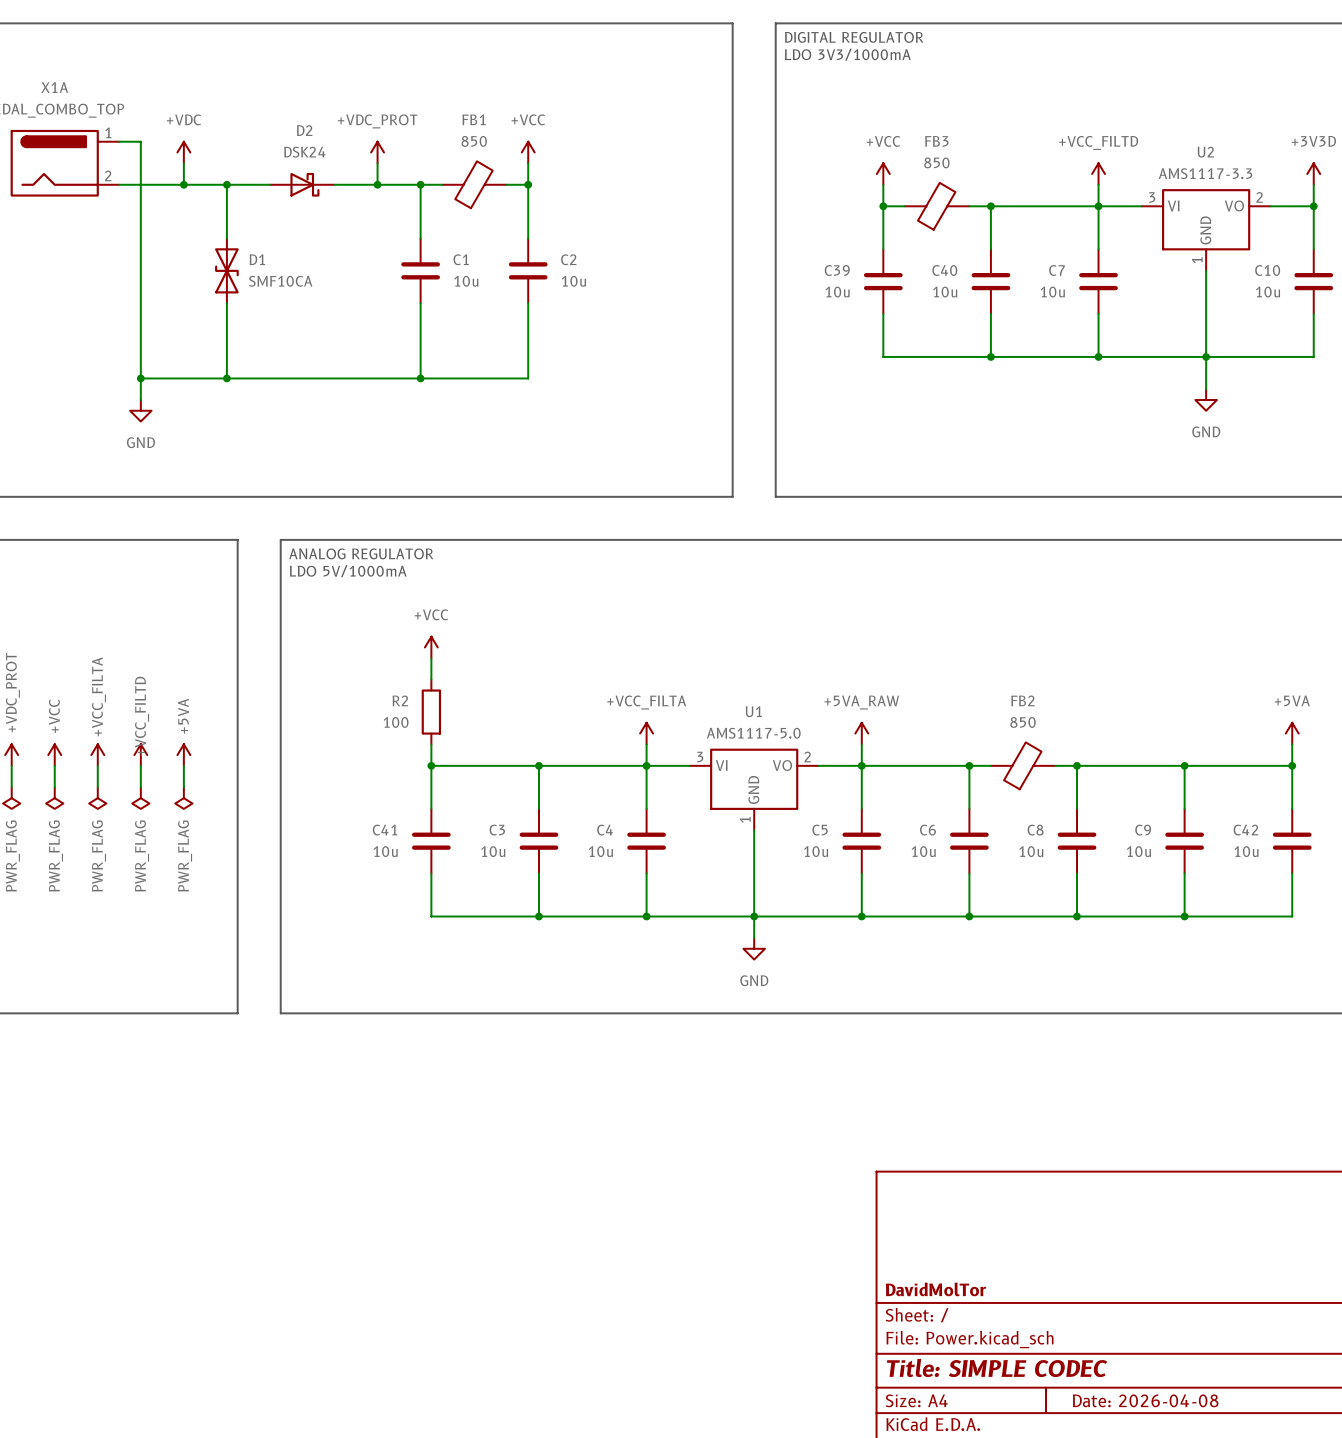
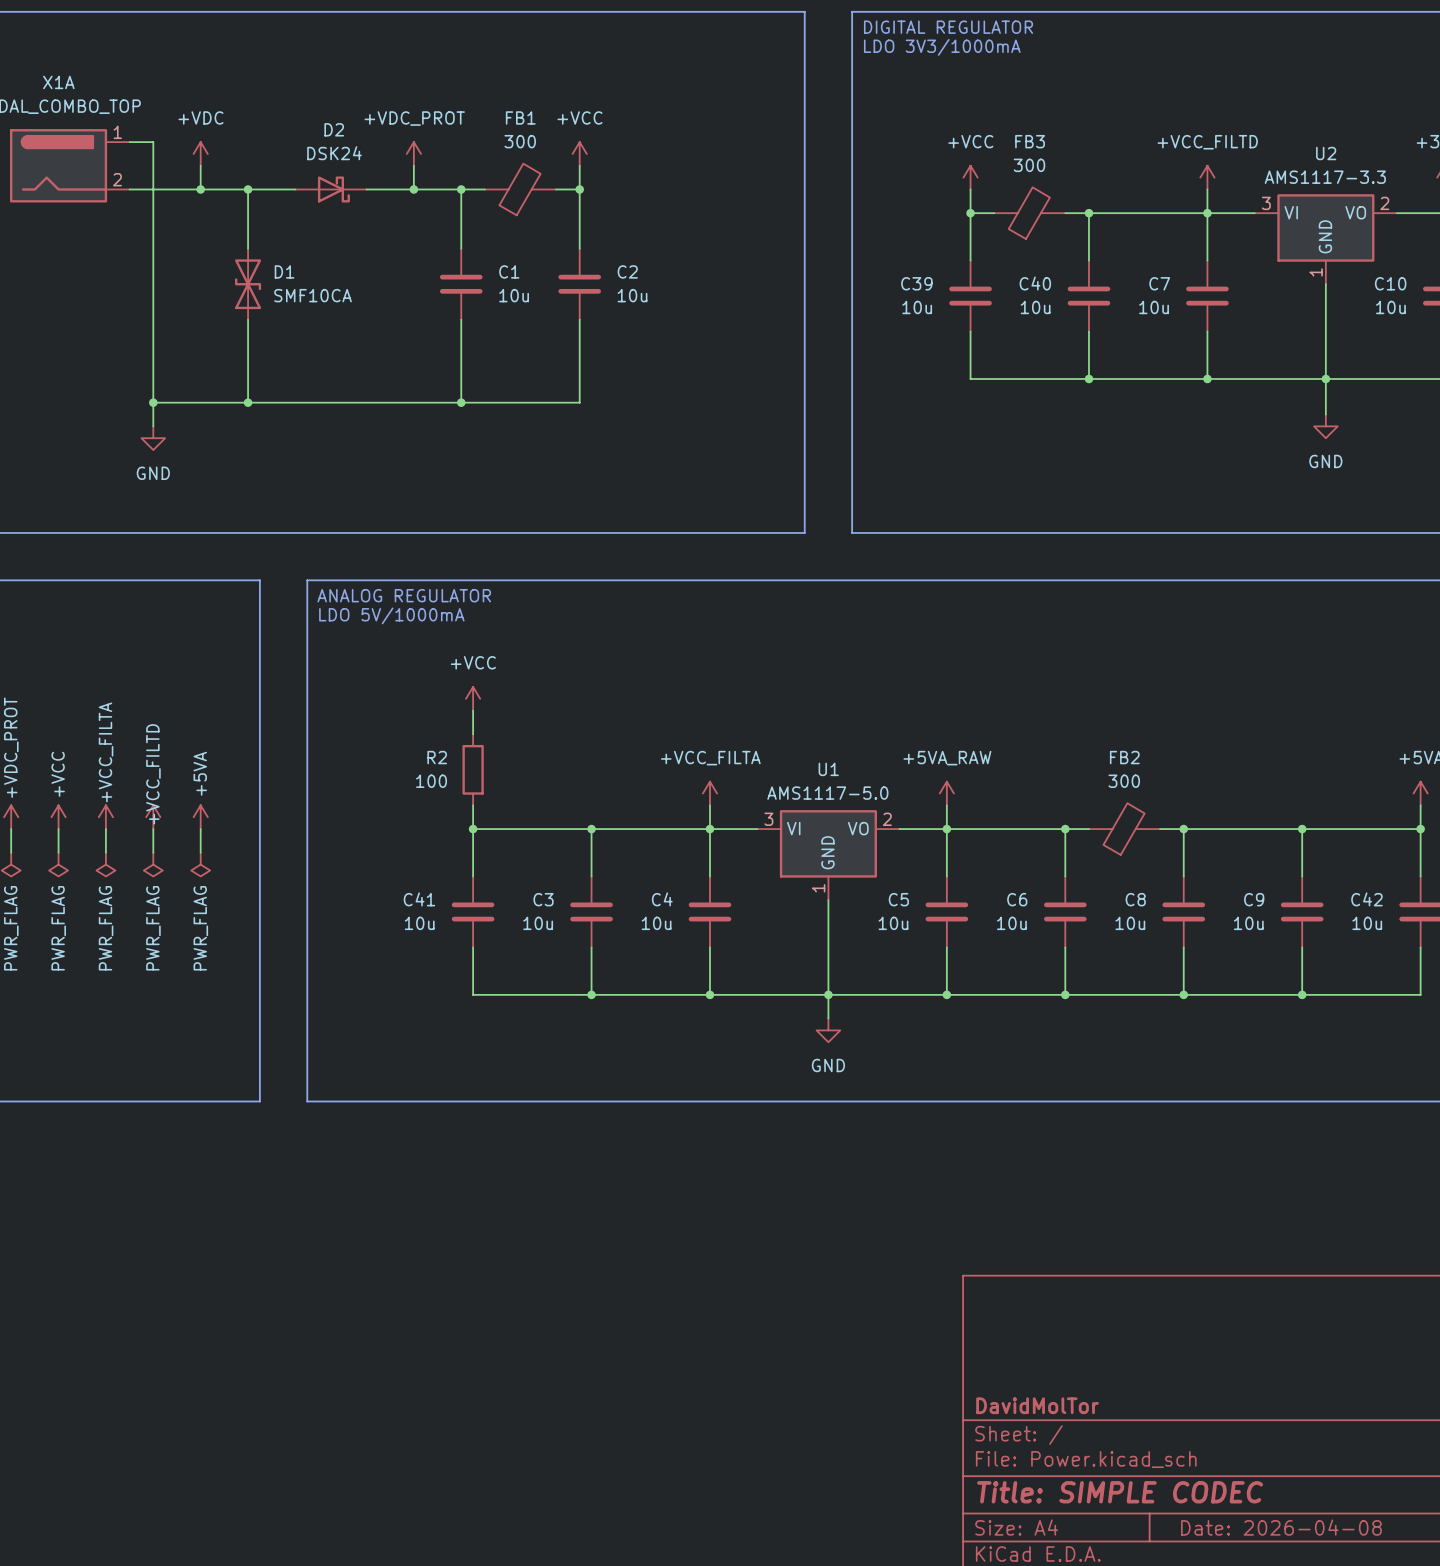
FB1 value: 850 (474, 141) -> 300 (520, 141)
FB3 value: 850 (936, 162) -> 300 (1029, 165)
FB2 value: 850 (1022, 722) -> 300 (1124, 781)

